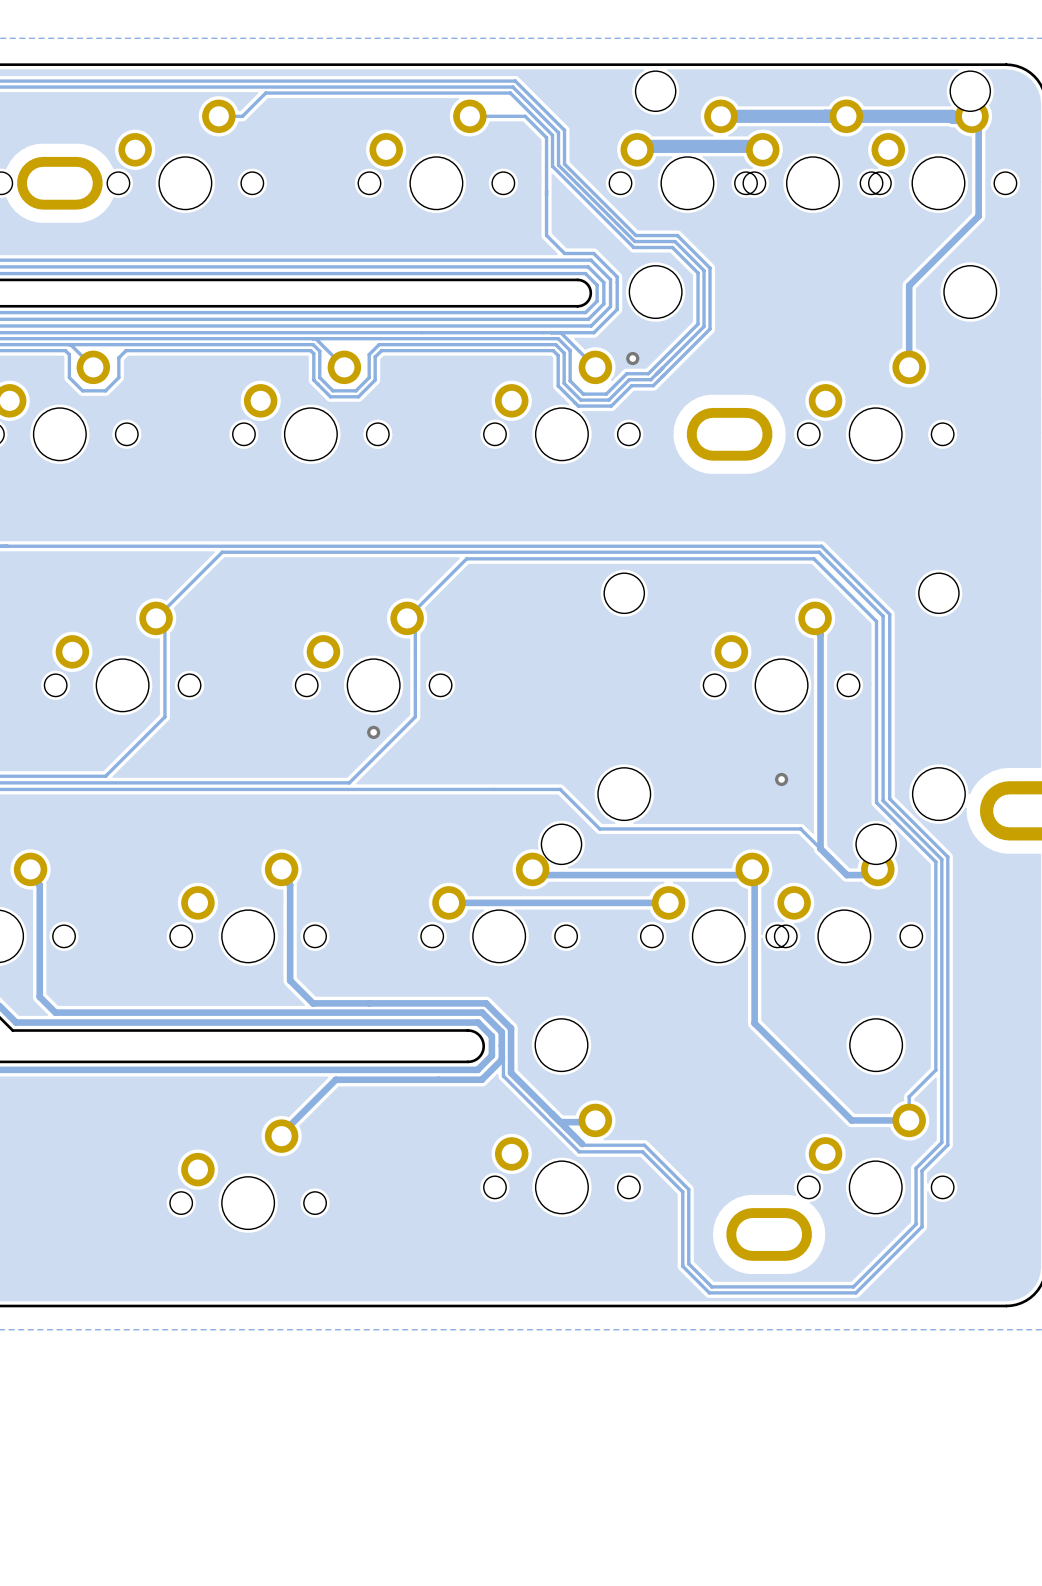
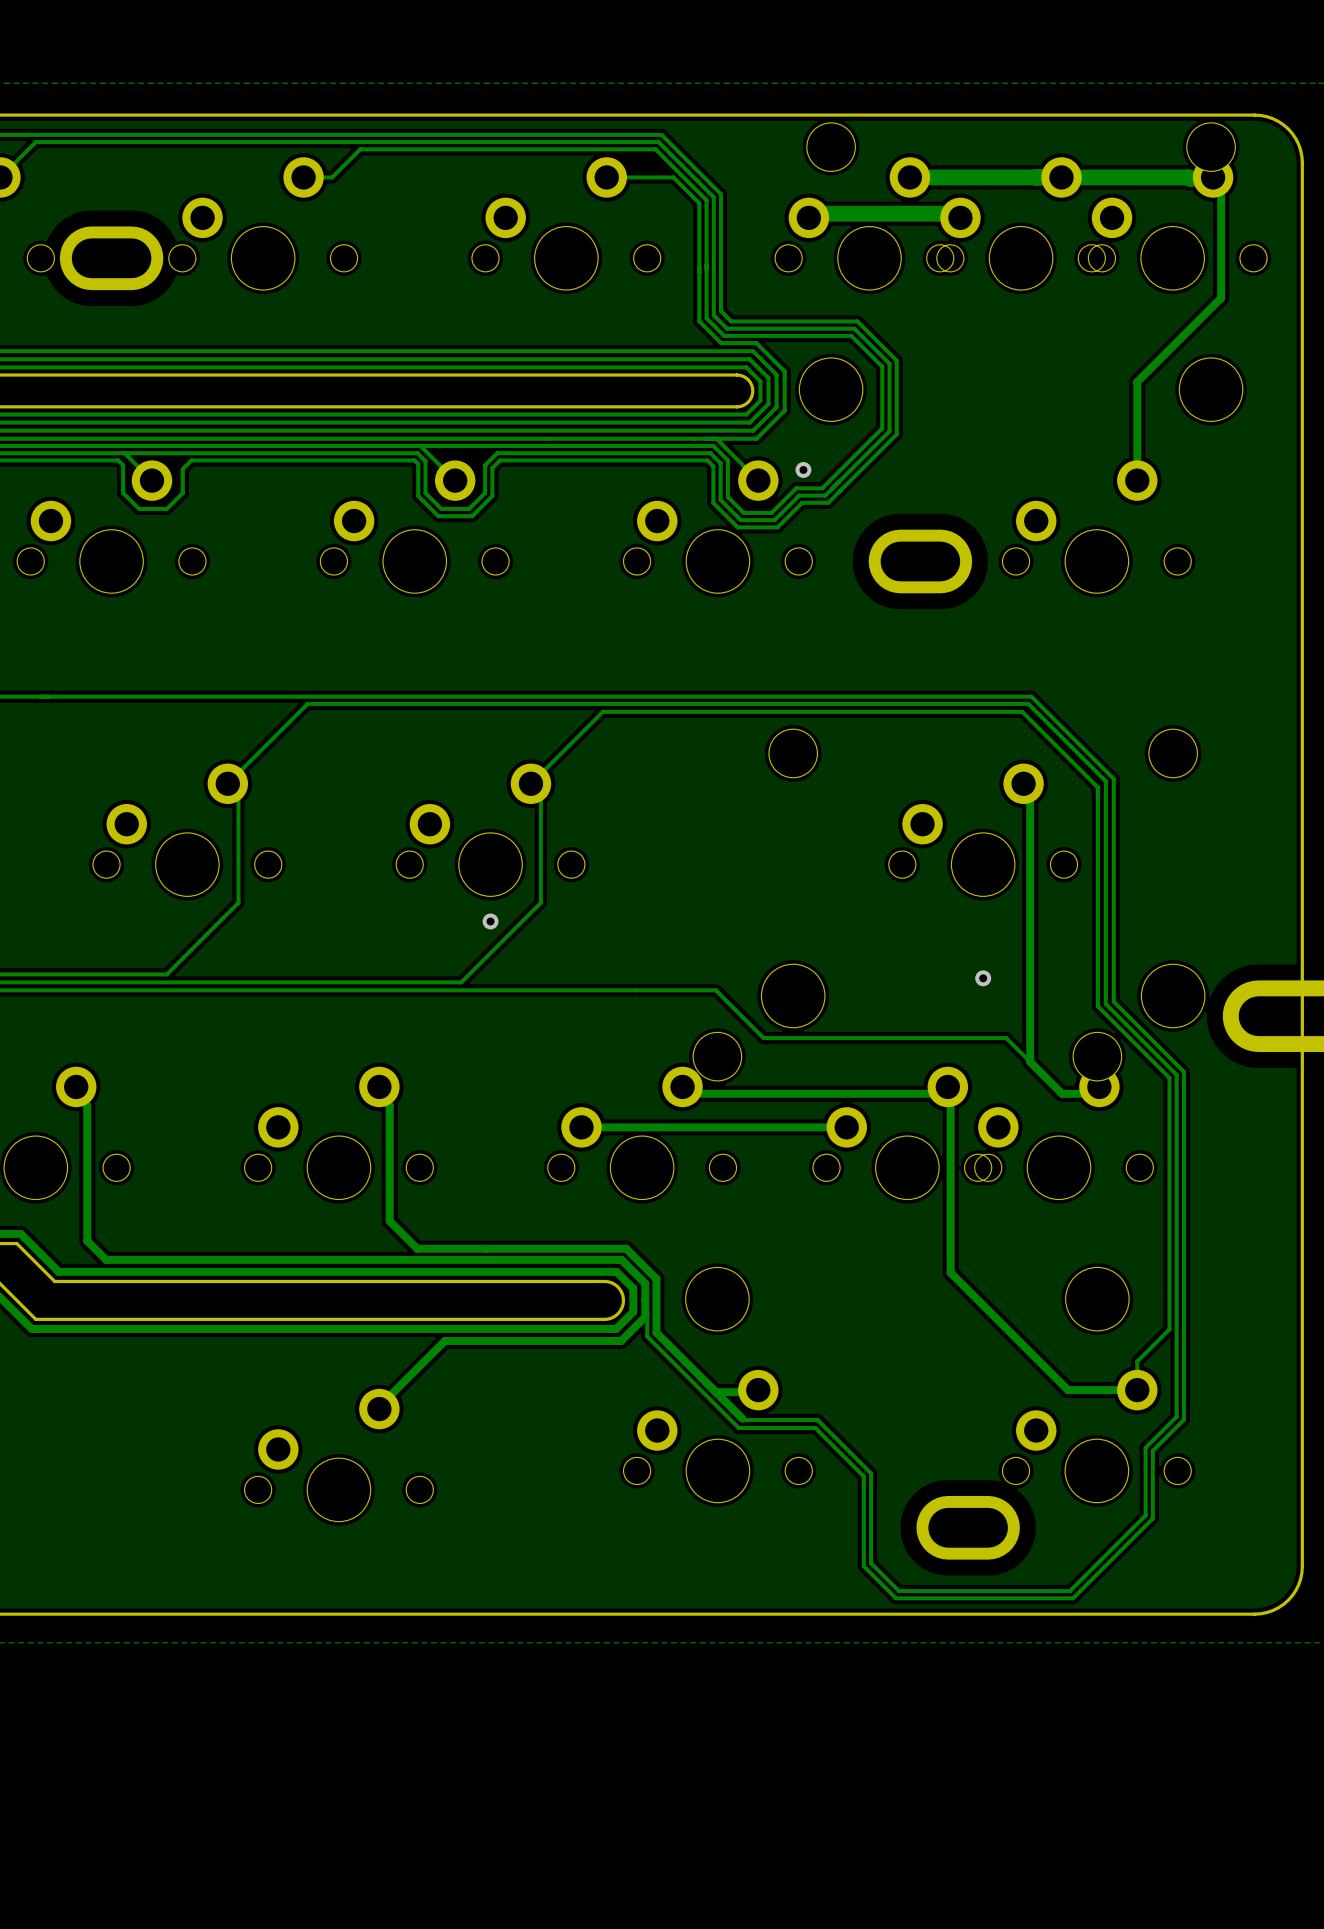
track: (564, 164) (635, 235) -> (721, 235) (721, 311) (731, 321) (807, 321)
track: (558, 165) (634, 241) -> (713, 236) (713, 315) (727, 328) (805, 328)
track: (552, 166) (633, 247) -> (706, 237) (706, 318) (724, 335) (804, 335)

